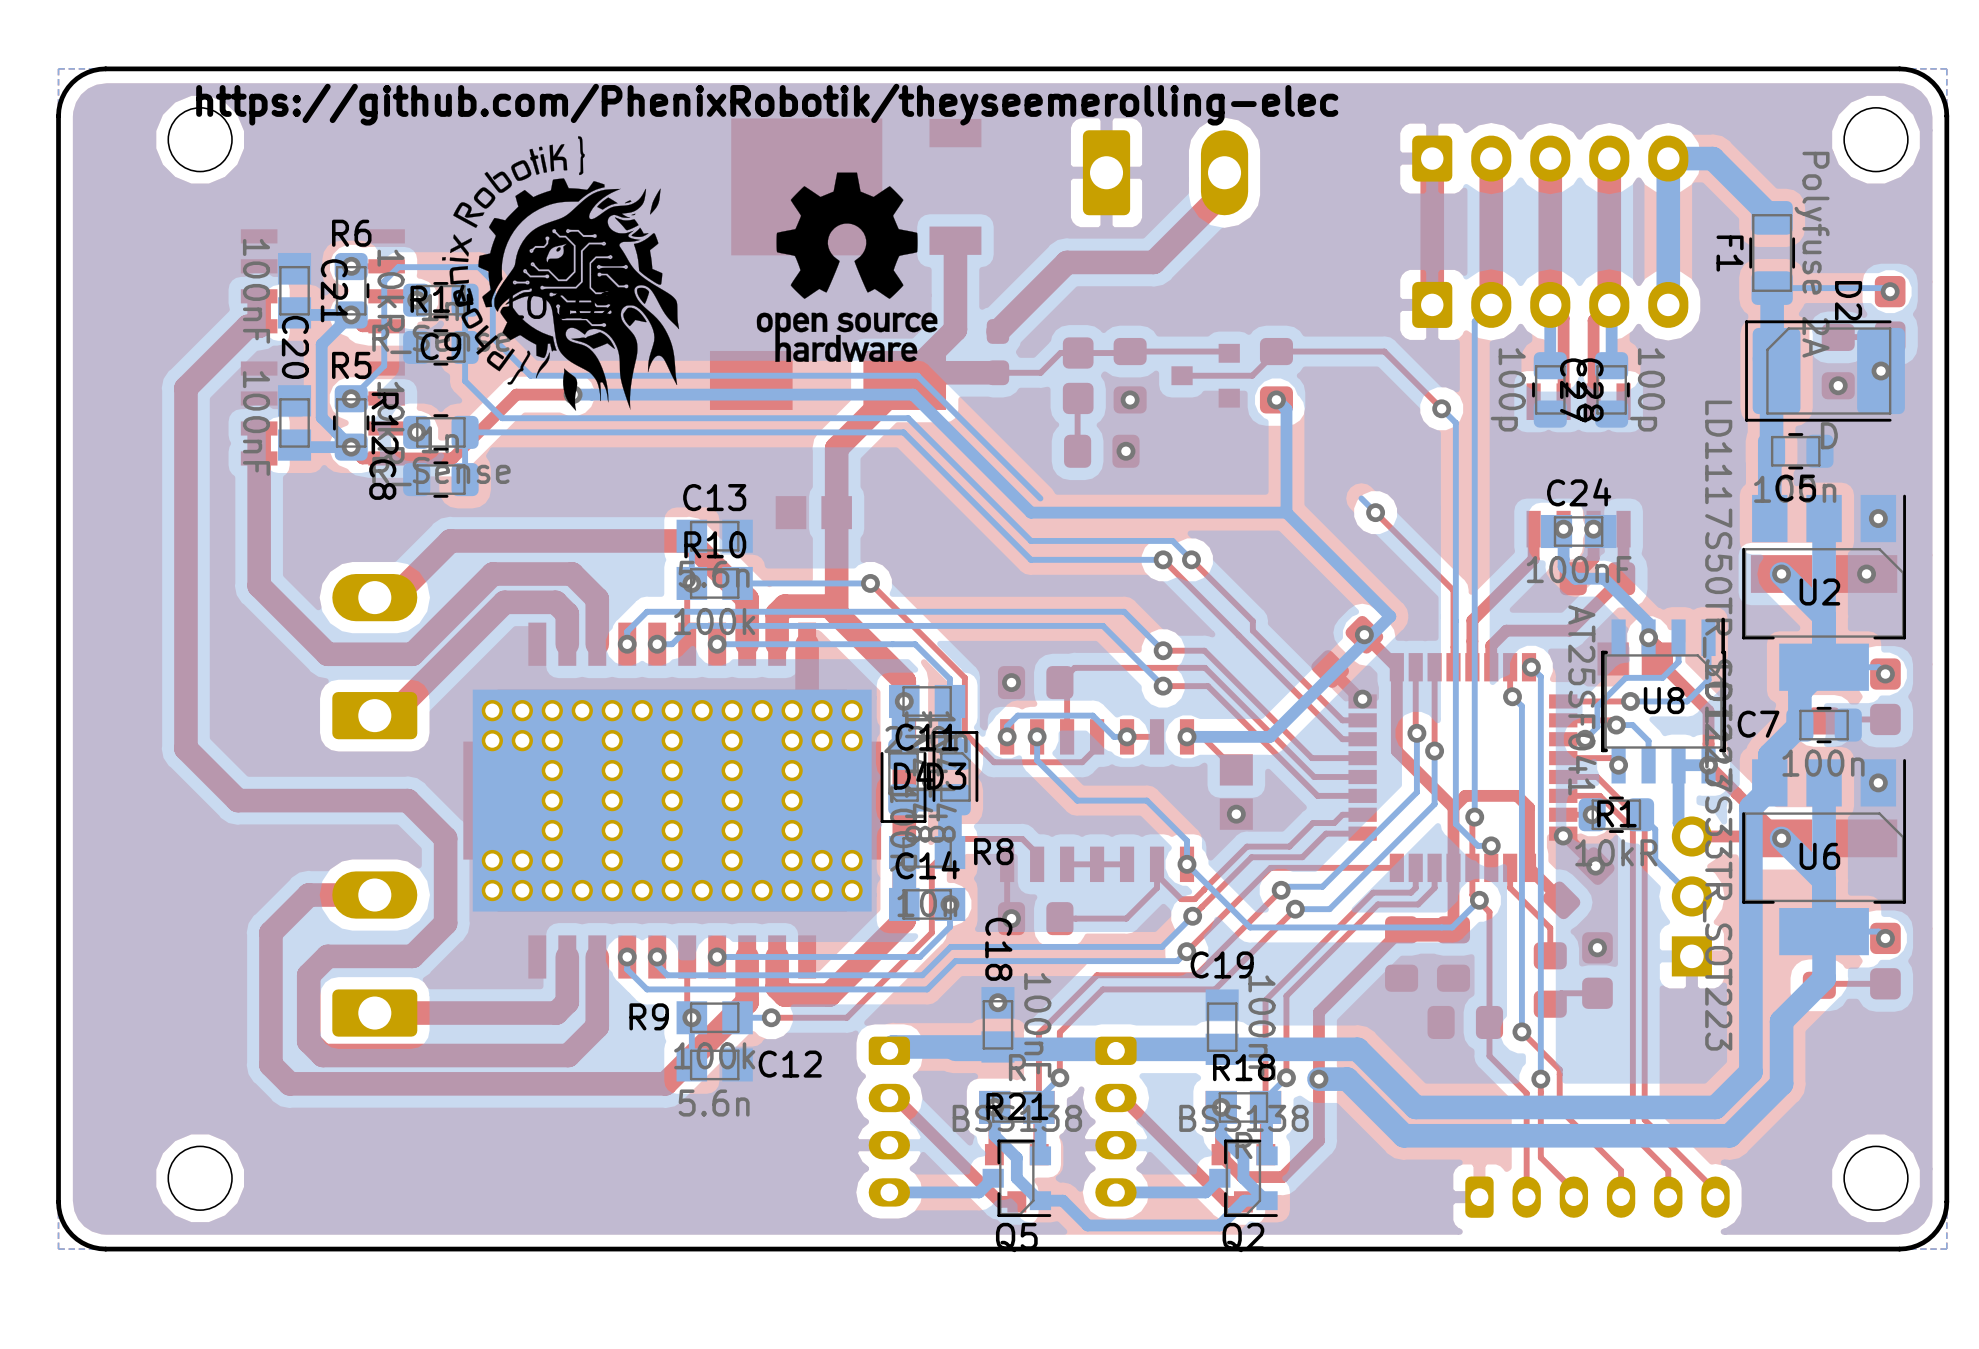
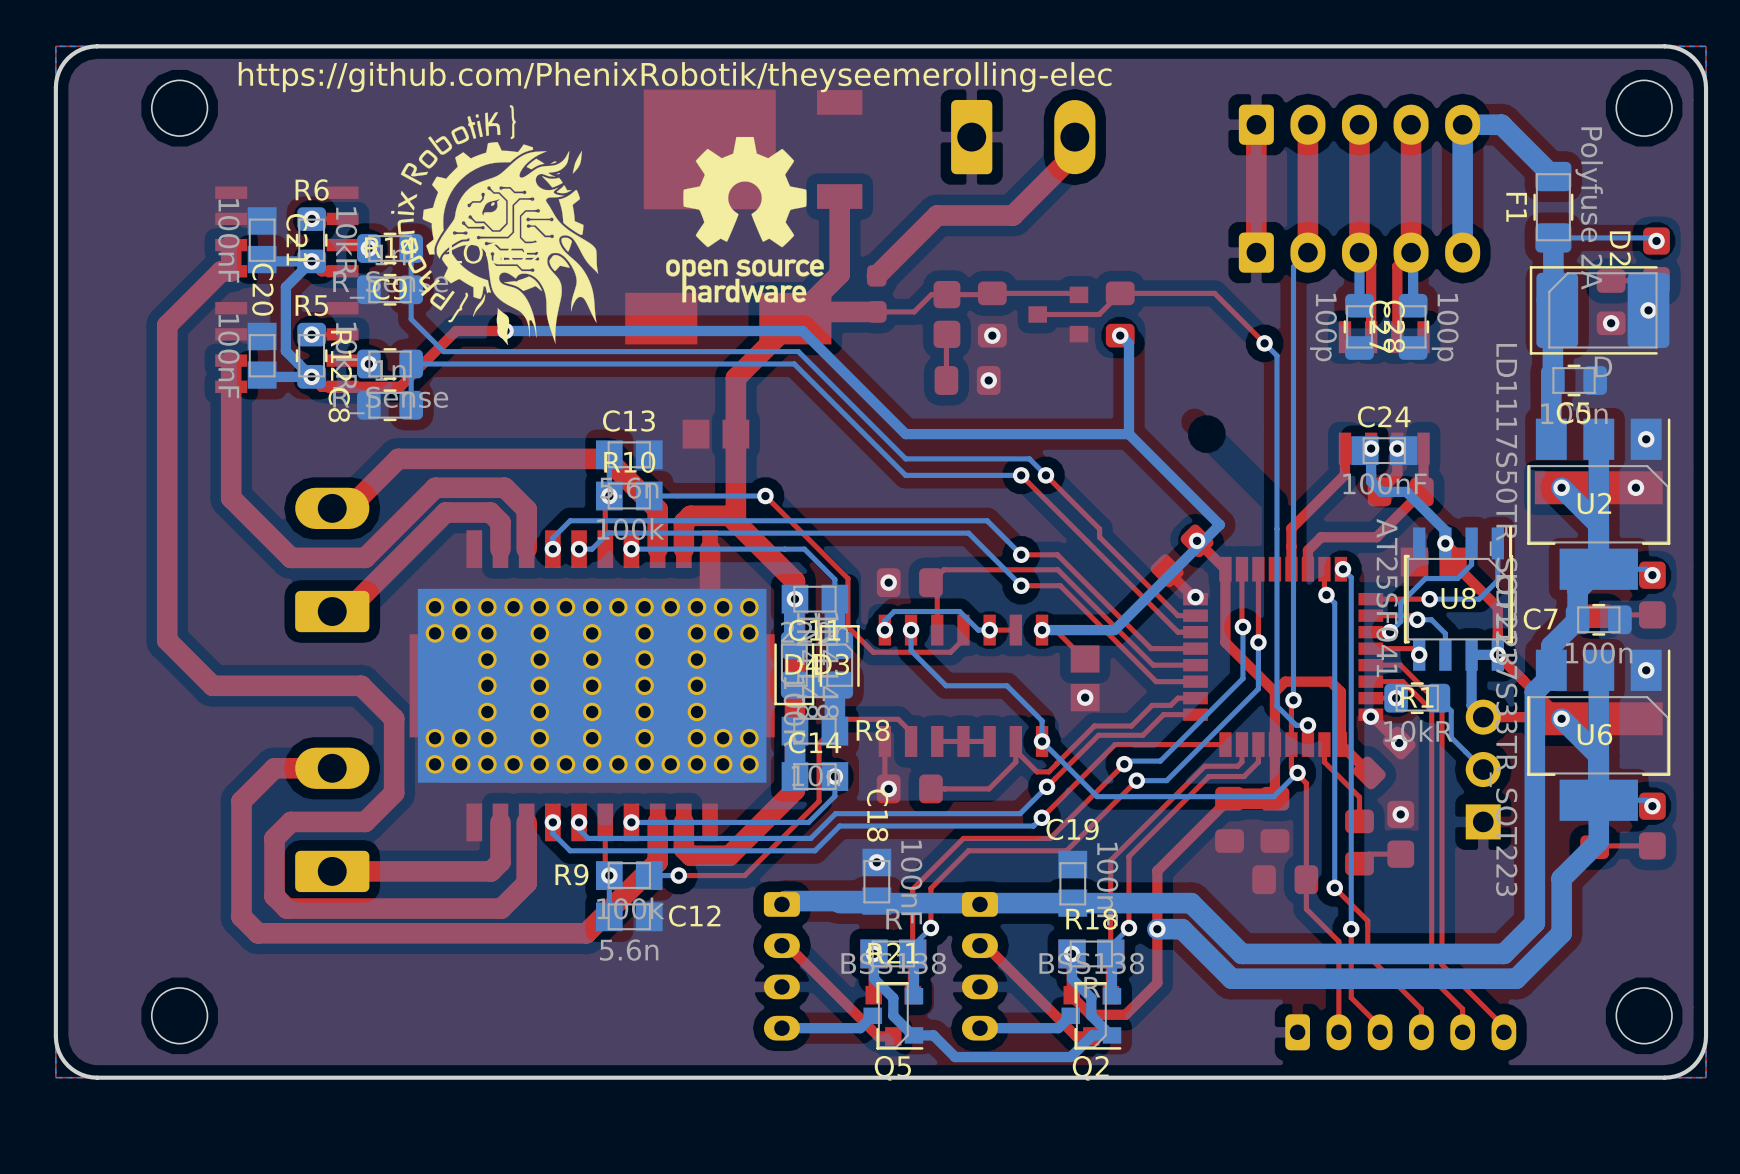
bottom track: (351, 398) (384, 365) (384, 281) (398, 267) (478, 267) (492, 281) (492, 337) (530, 375) (917, 375) (1040, 498) -> none
bottom track: (1361, 498) (1375, 512) -> none
top track: (1375, 512) (1453, 590) (1453, 667) -> none
via: (1375, 512) -> none

